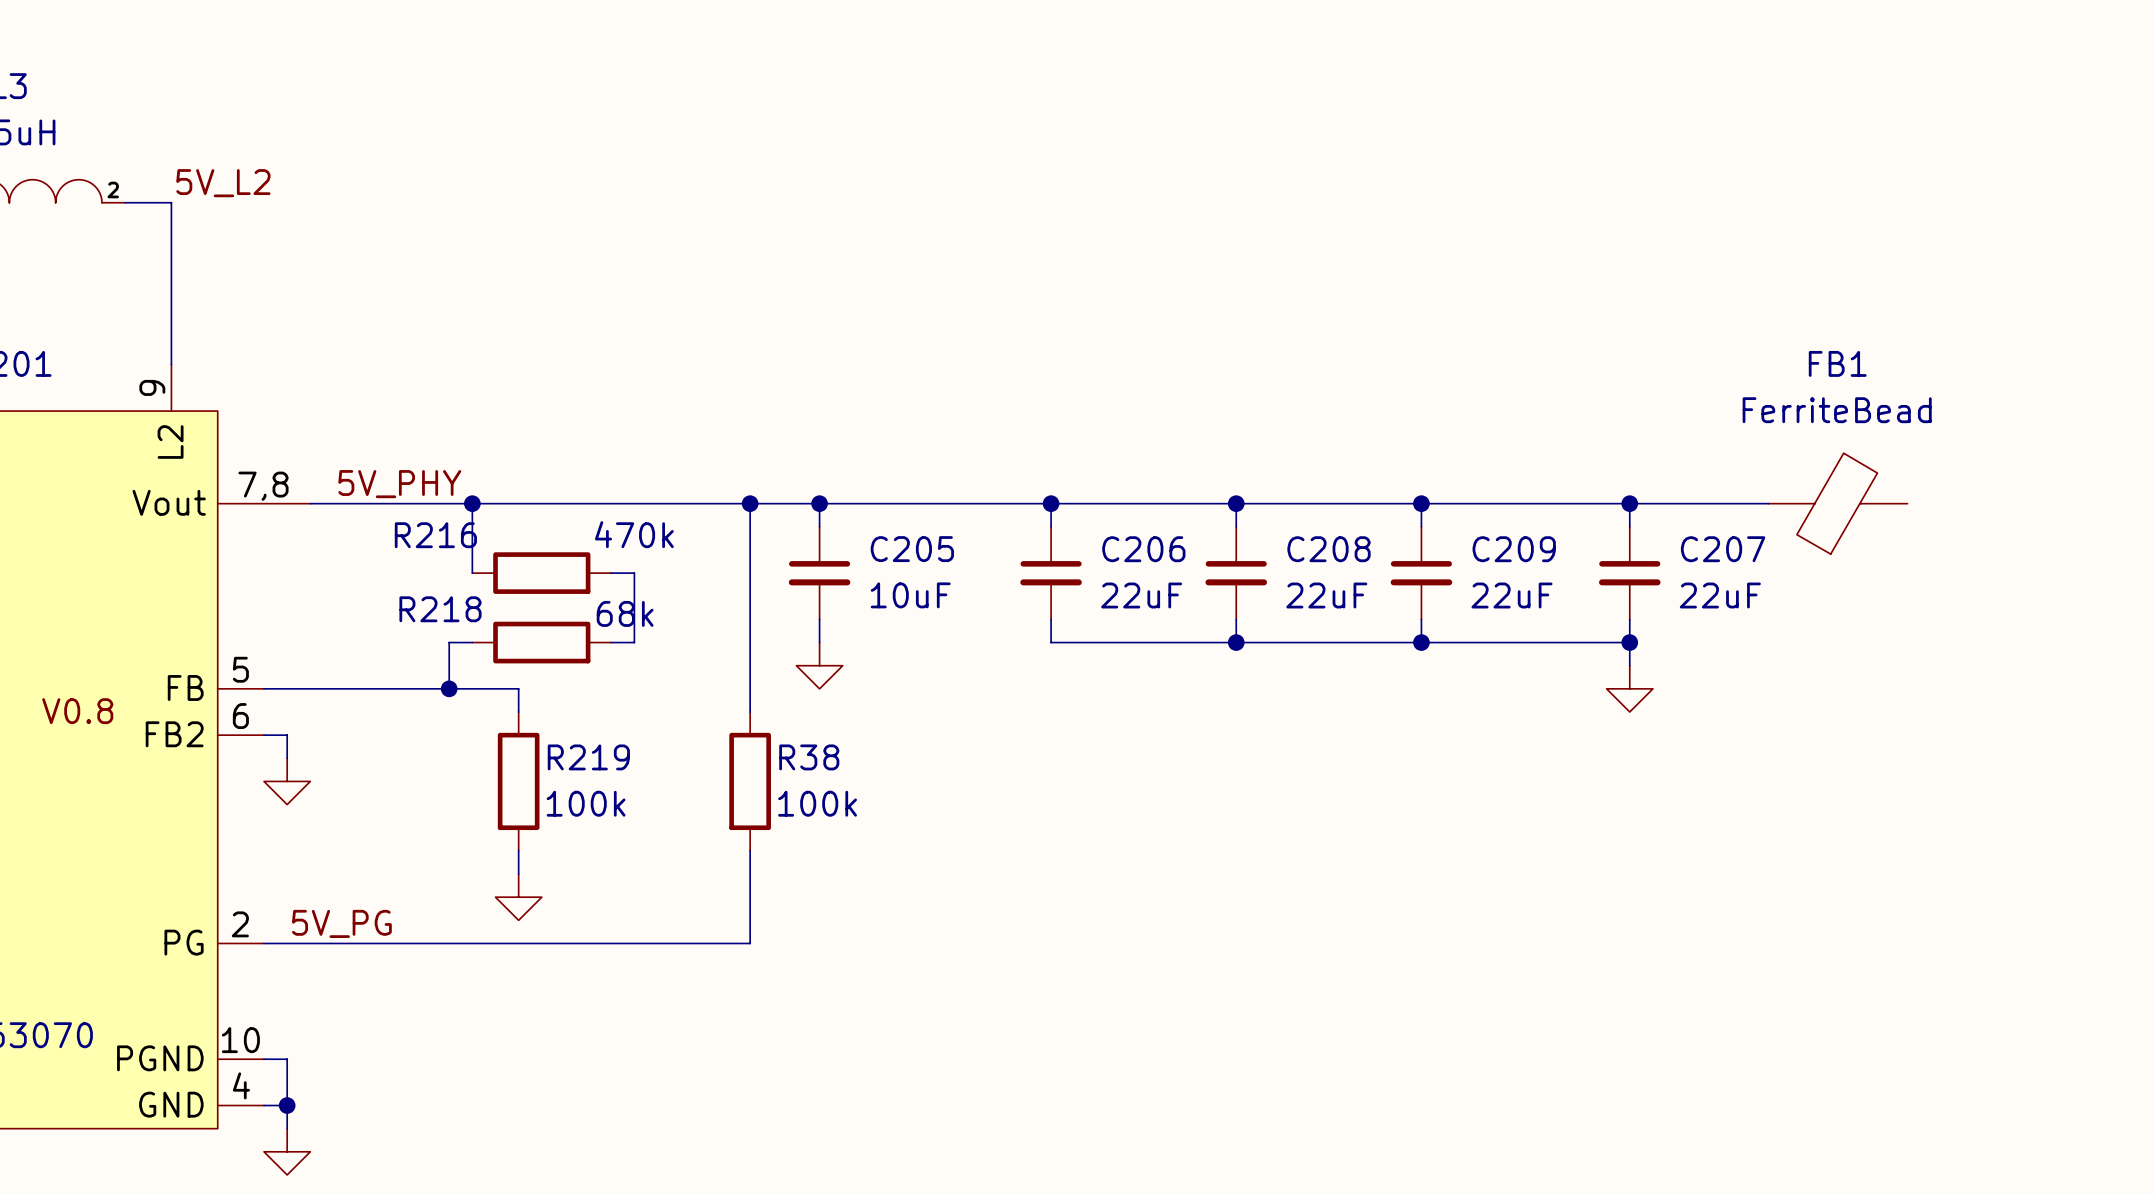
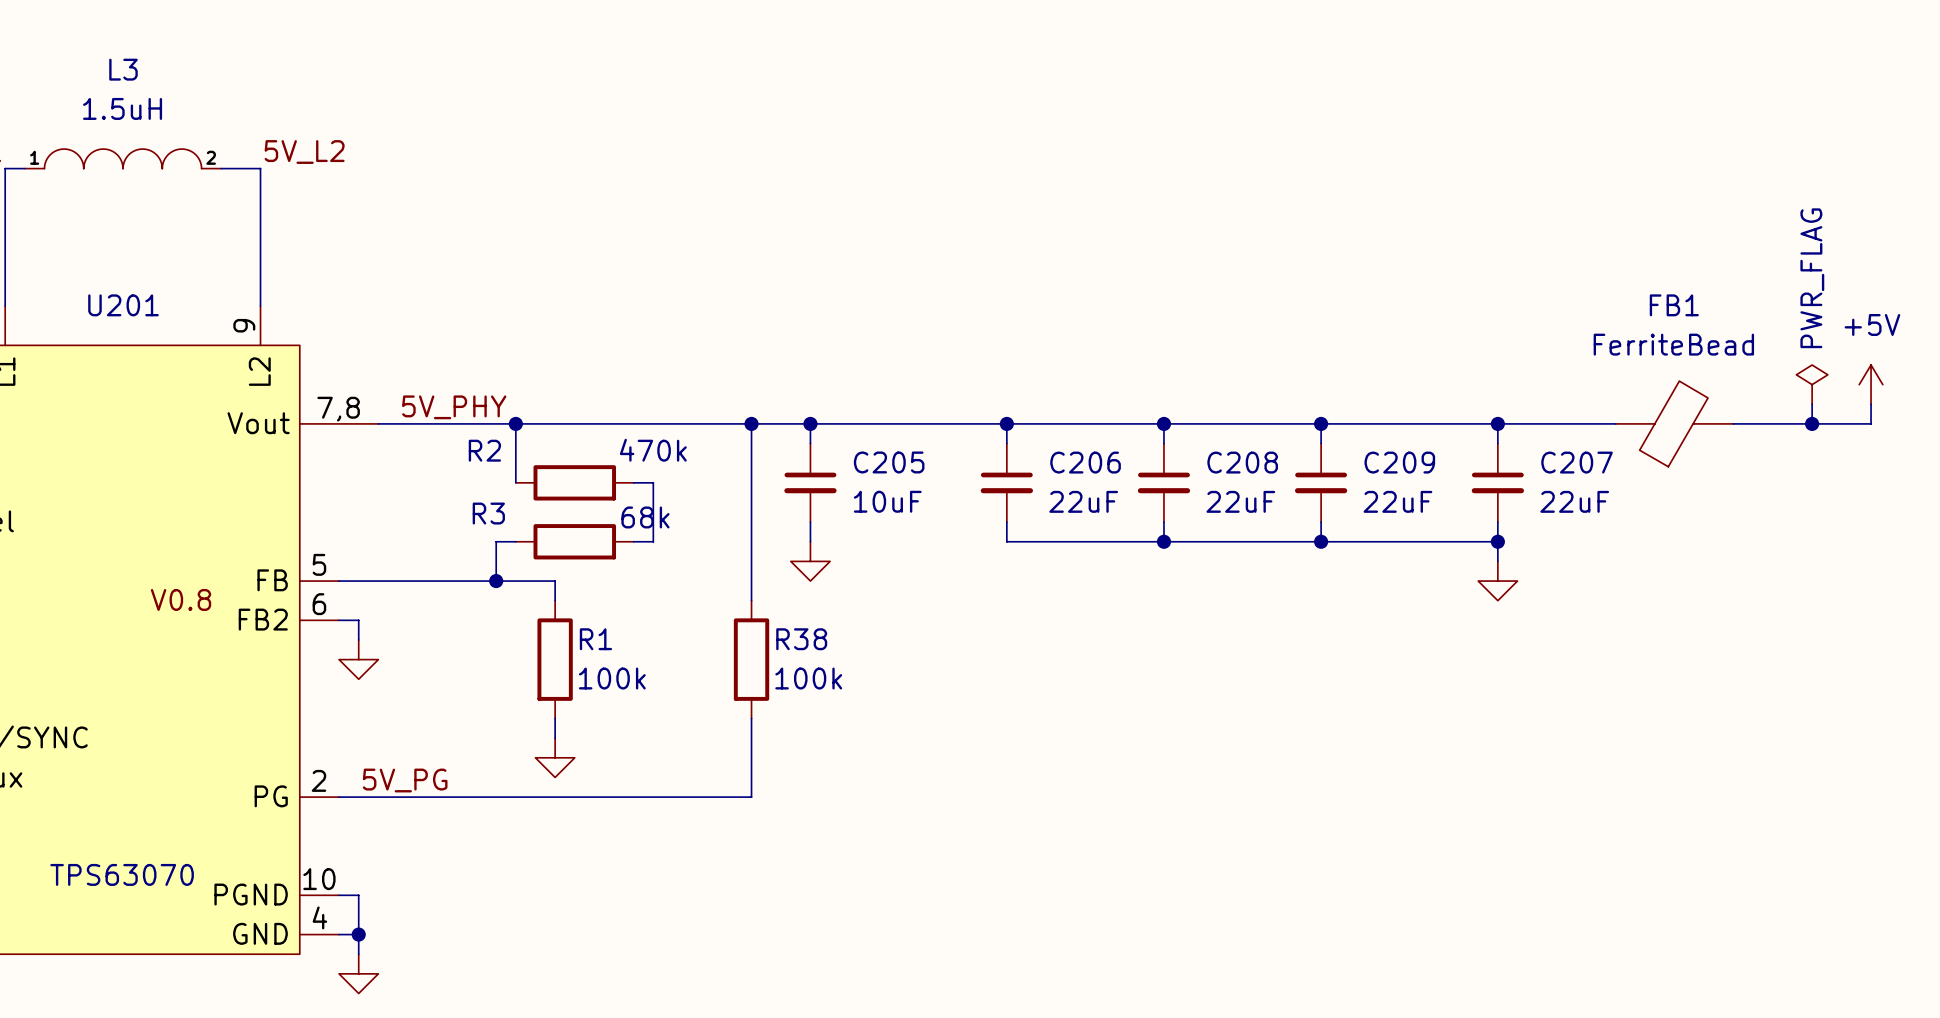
power symbol: none -> PWR_FLAG (1812, 384)
power symbol: none -> +5V (1871, 384)
wire: none -> (1812, 404) (1812, 423)
wire: none -> (1871, 404) (1871, 423) (1733, 423)
junction: none -> (1812, 423)
R216 name: R216 (435, 535) -> R2 (484, 450)
R218 name: R218 (440, 609) -> R3 (488, 513)
R219 name: R219 (588, 757) -> R1 (595, 639)

